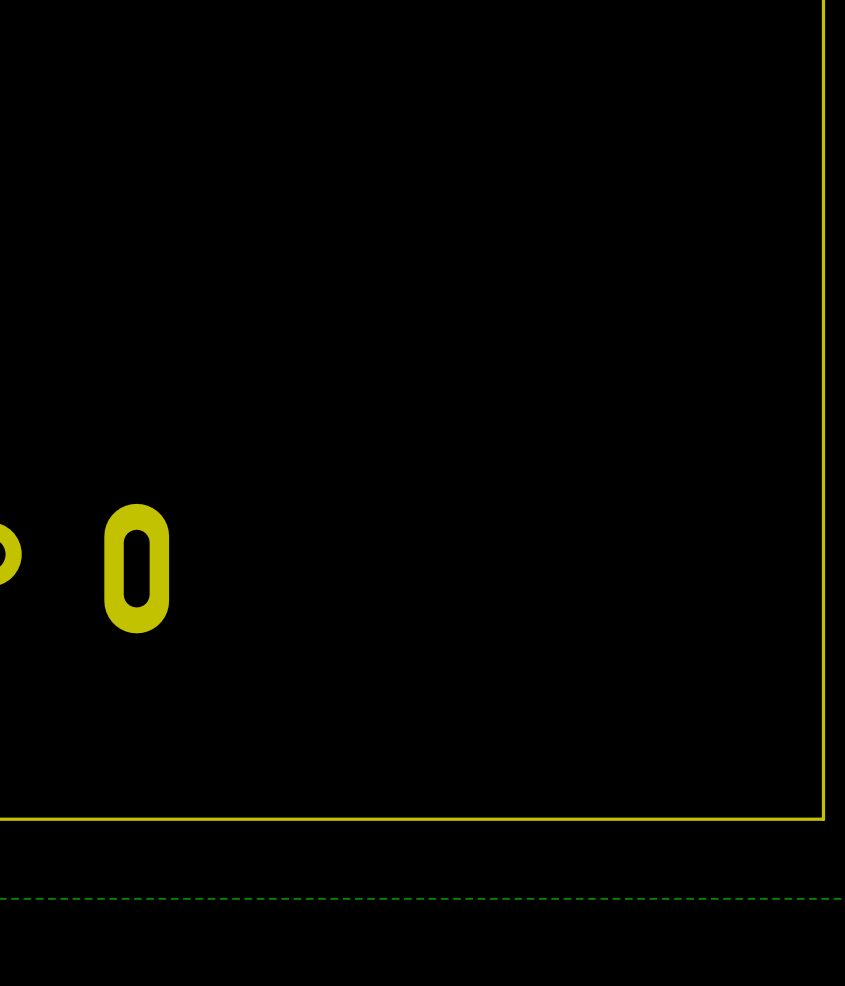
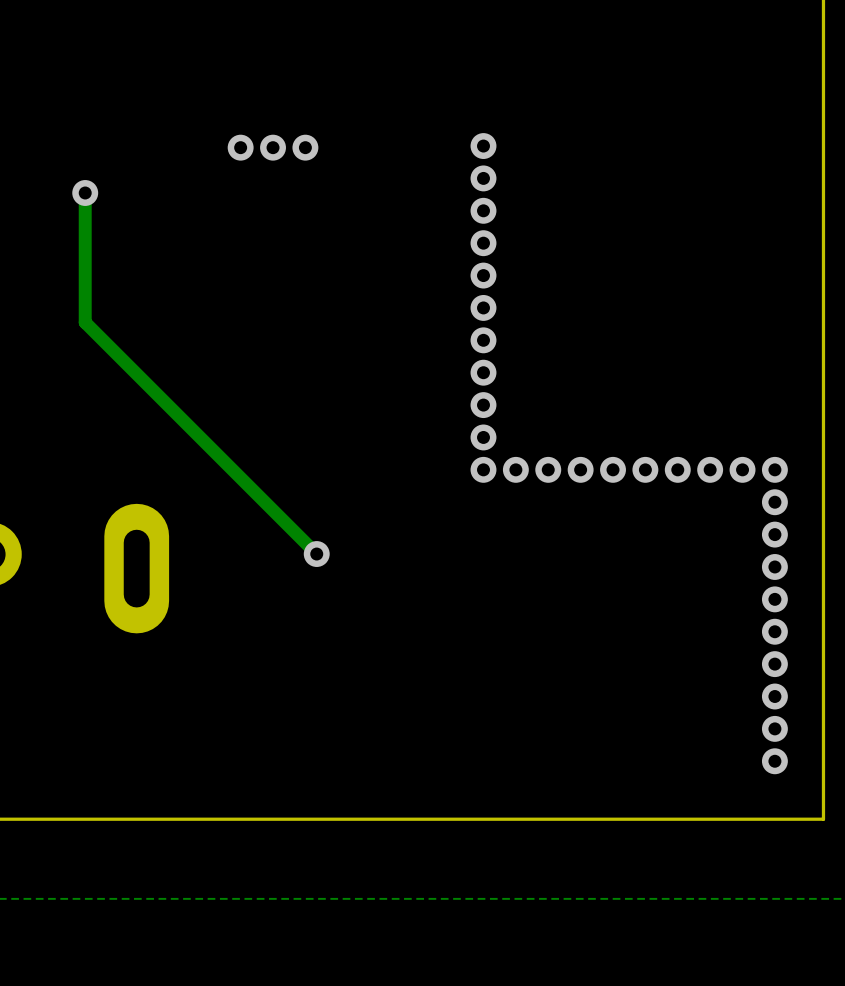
via: none -> (483, 146)
via: none -> (240, 147)
via: none -> (273, 147)
via: none -> (305, 147)
via: none -> (483, 178)
track: none -> (85, 192) (85, 322) (316, 554)
via: none -> (85, 192)
via: none -> (483, 210)
via: none -> (483, 243)
via: none -> (483, 275)
via: none -> (483, 307)
via: none -> (483, 340)
via: none -> (483, 372)
via: none -> (483, 405)
via: none -> (483, 437)
via: none -> (483, 469)
via: none -> (515, 469)
via: none -> (548, 469)
via: none -> (580, 469)
via: none -> (613, 469)
via: none -> (645, 469)
via: none -> (677, 469)
via: none -> (710, 469)
via: none -> (742, 469)
via: none -> (774, 469)
via: none -> (774, 502)
via: none -> (774, 534)
via: none -> (316, 554)
via: none -> (774, 566)
via: none -> (774, 599)
via: none -> (774, 631)
via: none -> (774, 664)
via: none -> (774, 696)
via: none -> (774, 728)
via: none -> (774, 761)

